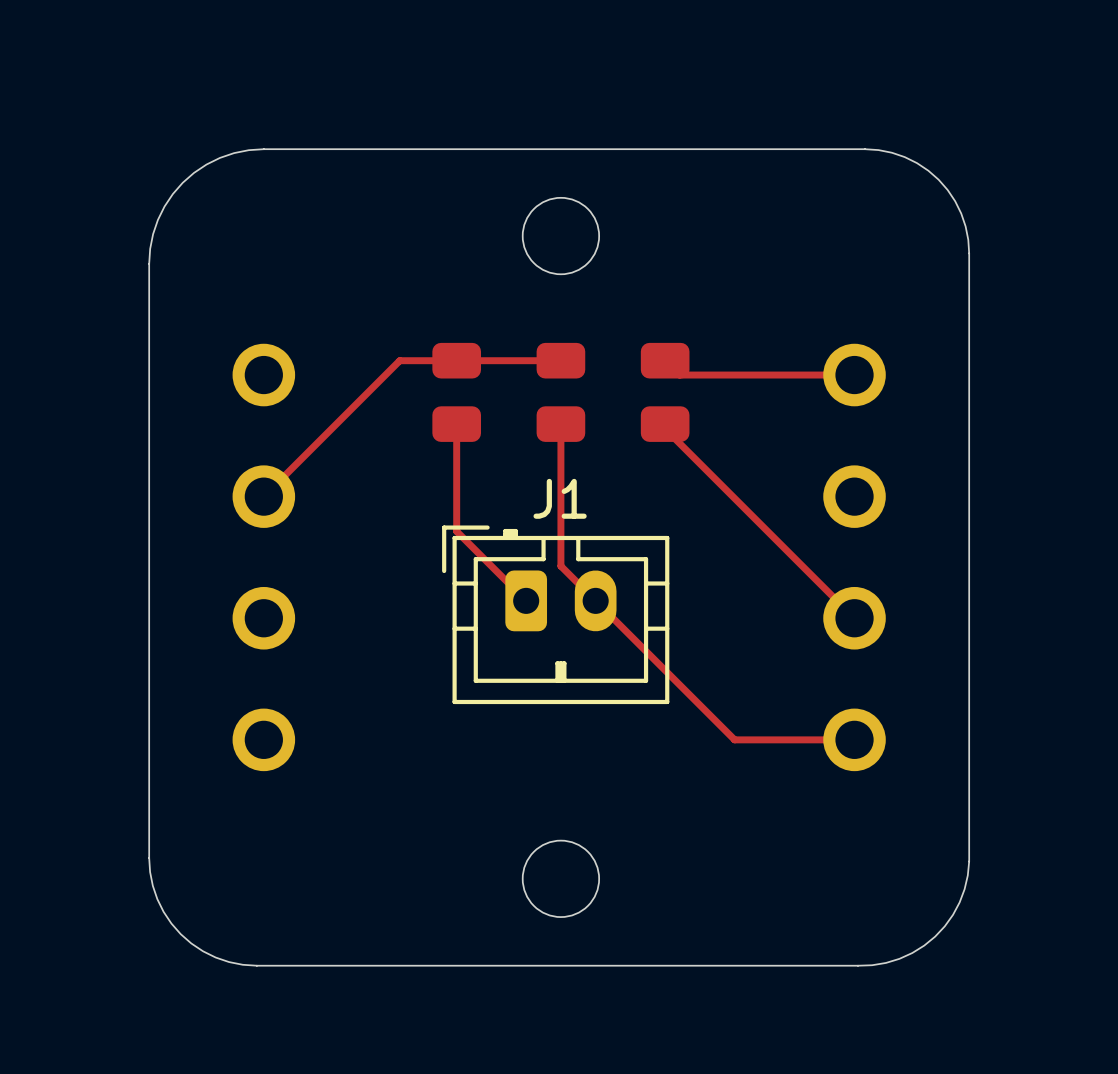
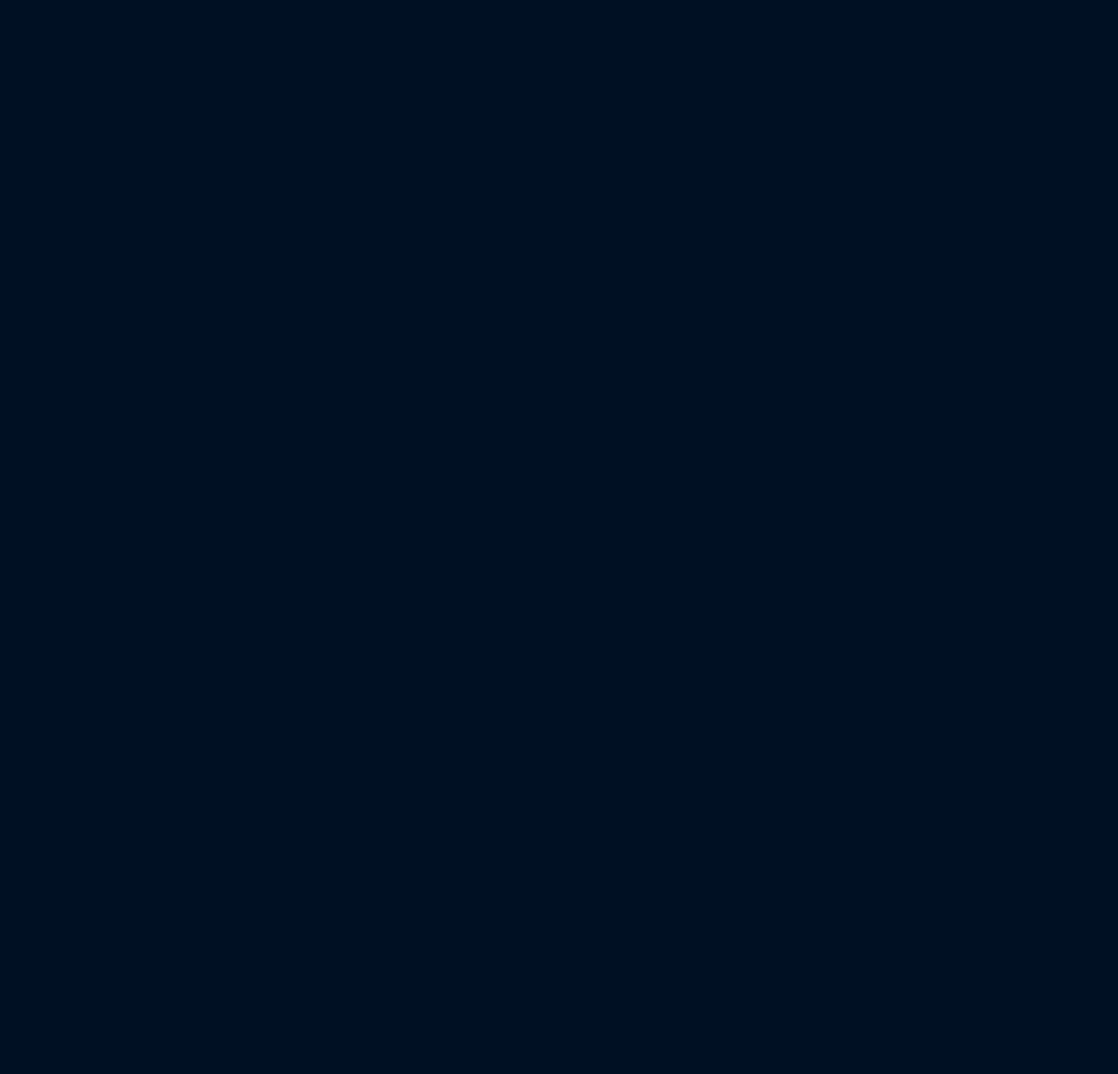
board edge: (864, 149) (263, 149) (234, 153) (206, 164) (194, 172) (172, 194) (157, 219) (153, 234) (149, 263) (149, 858) (152, 885) (163, 911) (171, 923) (191, 943) (215, 957) (229, 962) (256, 965) (858, 965) (885, 962) (912, 953) (935, 936) (944, 926) (959, 902) (964, 889) (969, 861) (968, 239) (965, 226) (955, 201) (947, 189) (928, 170) (904, 157) (878, 150) (864, 149) -> none
round board edge: [521, 196, 601, 276] -> none
top track: (560, 360) (399, 360) (263, 496) -> none
top track: (665, 360) (679, 375) (854, 375) -> none
part: (456, 392) -> none
part: (560, 392) -> none
part: (665, 392) -> none
top track: (456, 424) (456, 531) (526, 600) -> none
top track: (560, 424) (560, 566) (734, 739) (854, 739) -> none
top track: (665, 424) (665, 428) (854, 618) -> none
part: (263, 557) -> none
part: (854, 557) -> none
J1: (555, 614) -> none
round board edge: [521, 839, 601, 918] -> none

